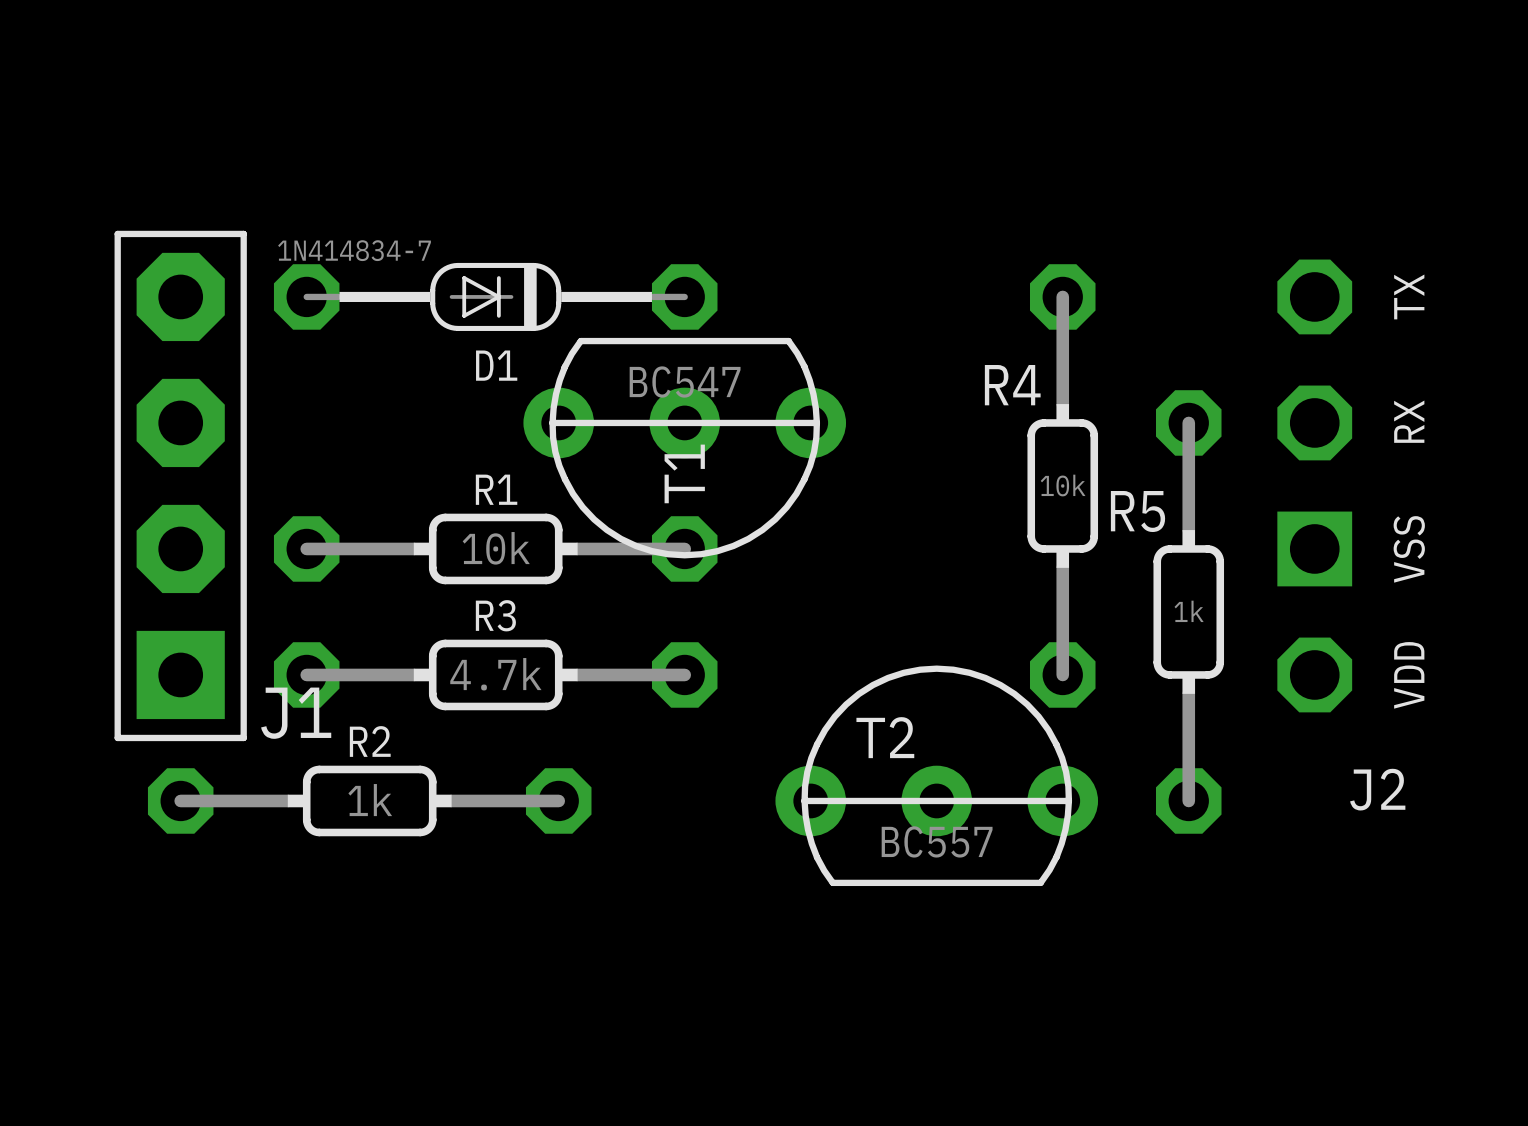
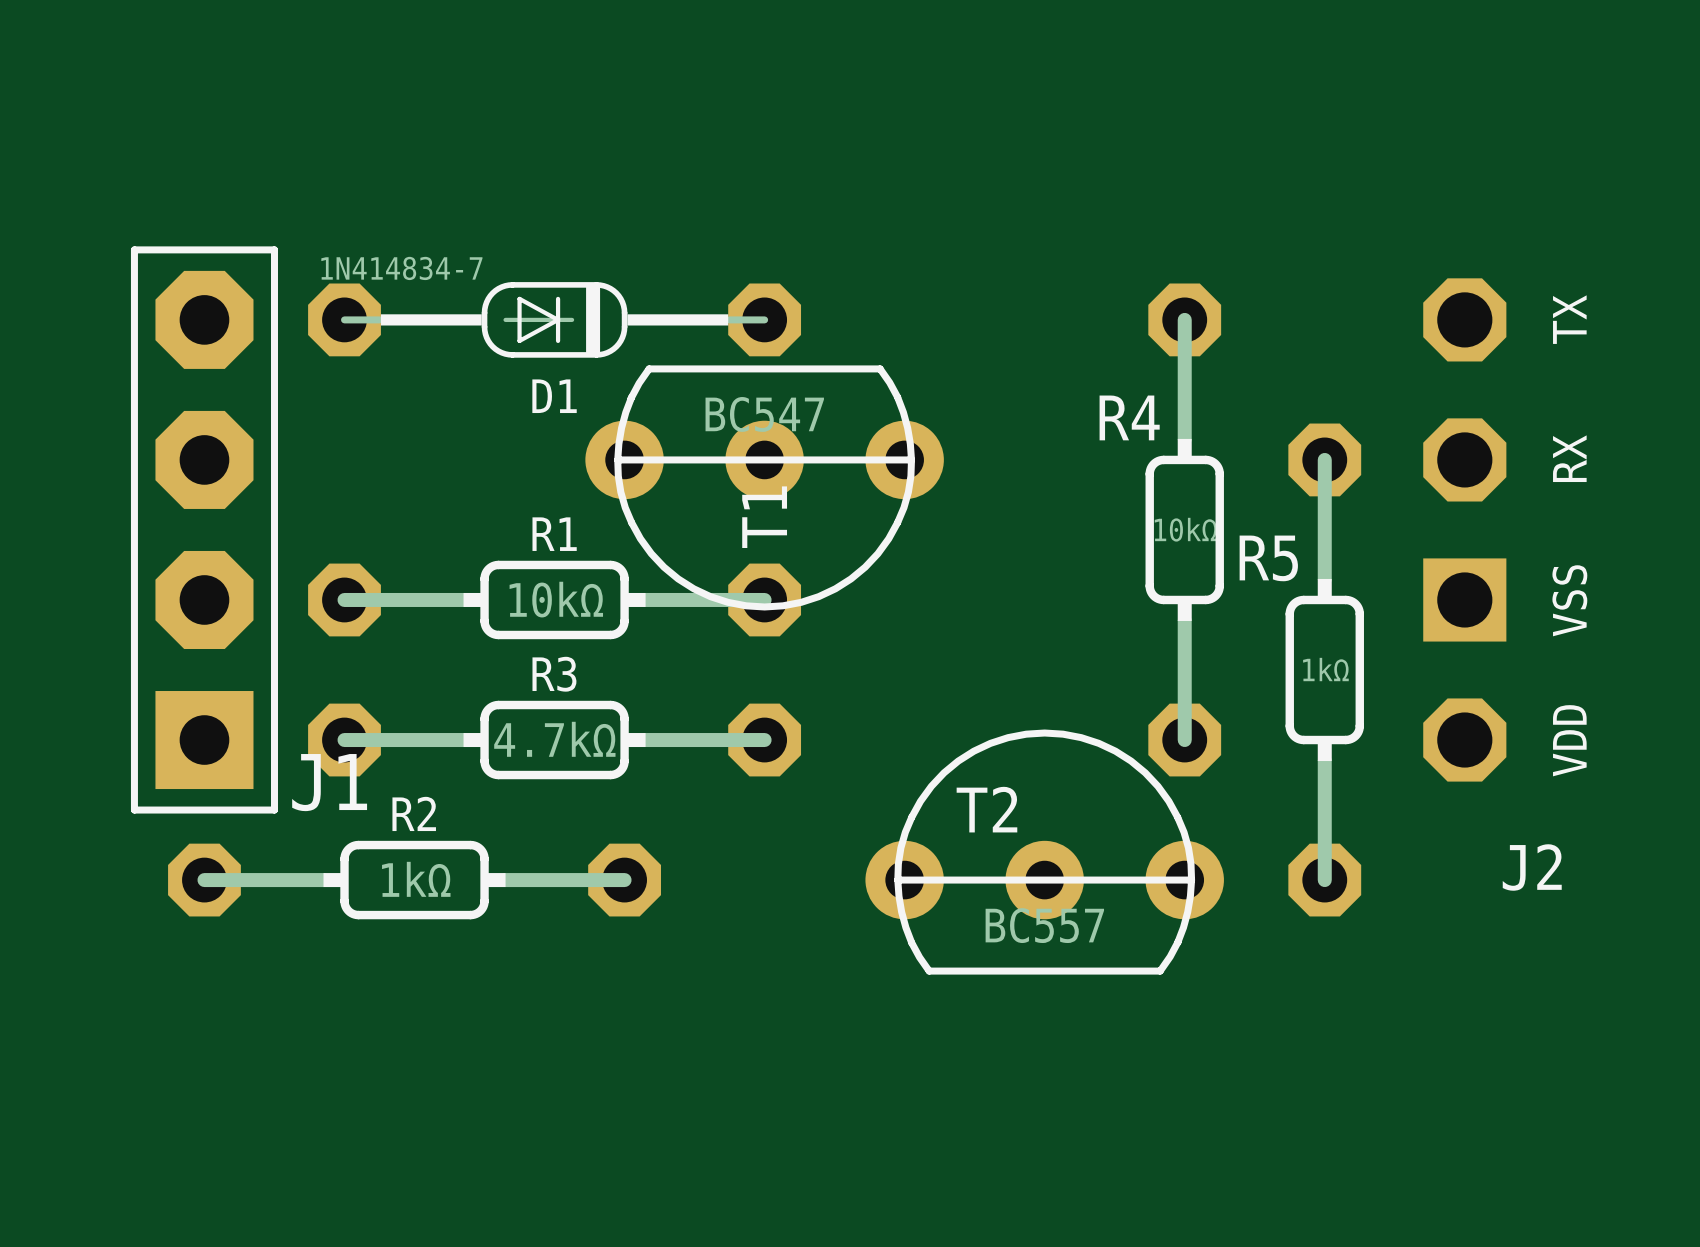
R4 value: 10k (1063, 485) -> 10kΩ (1185, 529)
R1 value: 10k (496, 548) -> 10kΩ (556, 599)
R5 value: 1k (1189, 611) -> 1kΩ (1325, 669)
R3 value: 4.7k (495, 674) -> 4.7kΩ (554, 739)
R2 value: 1k (370, 800) -> 1kΩ (416, 879)

